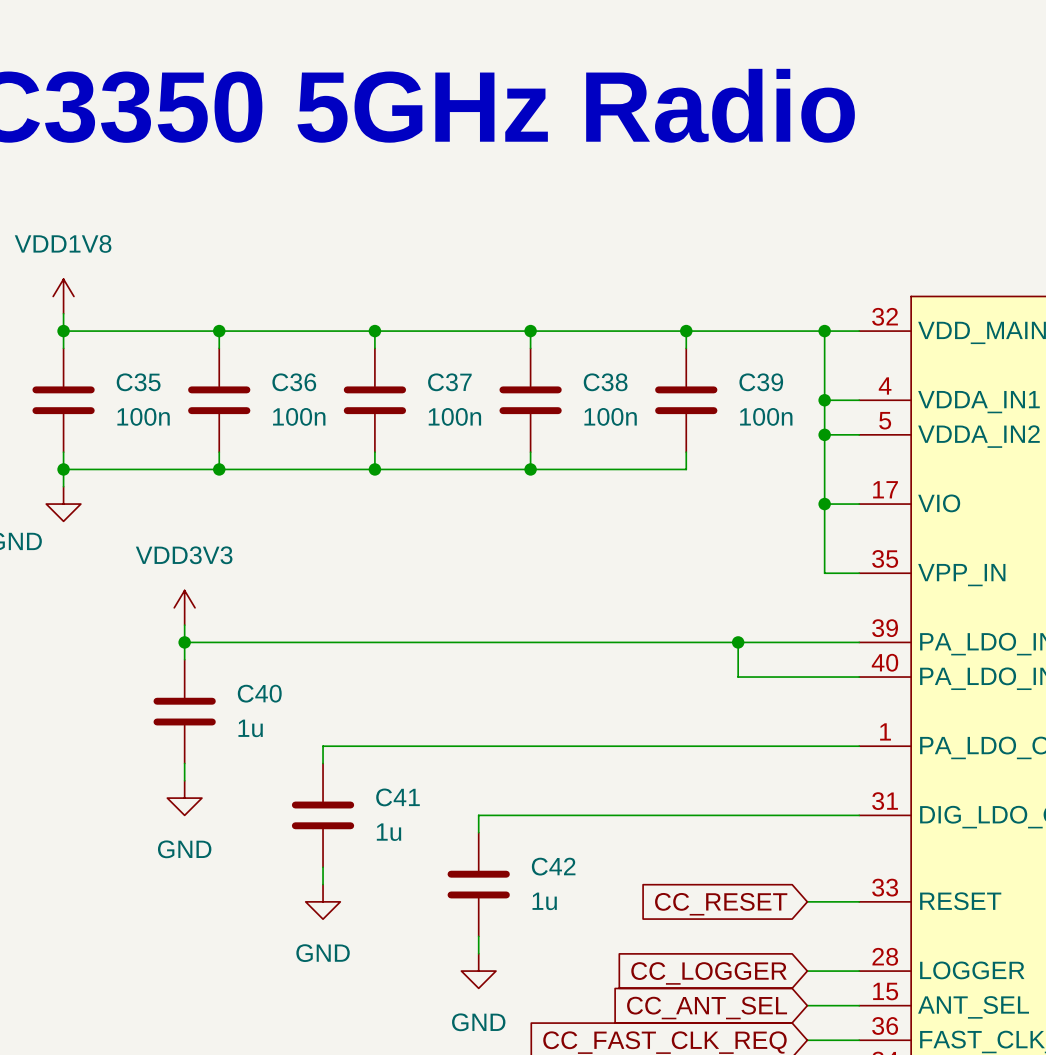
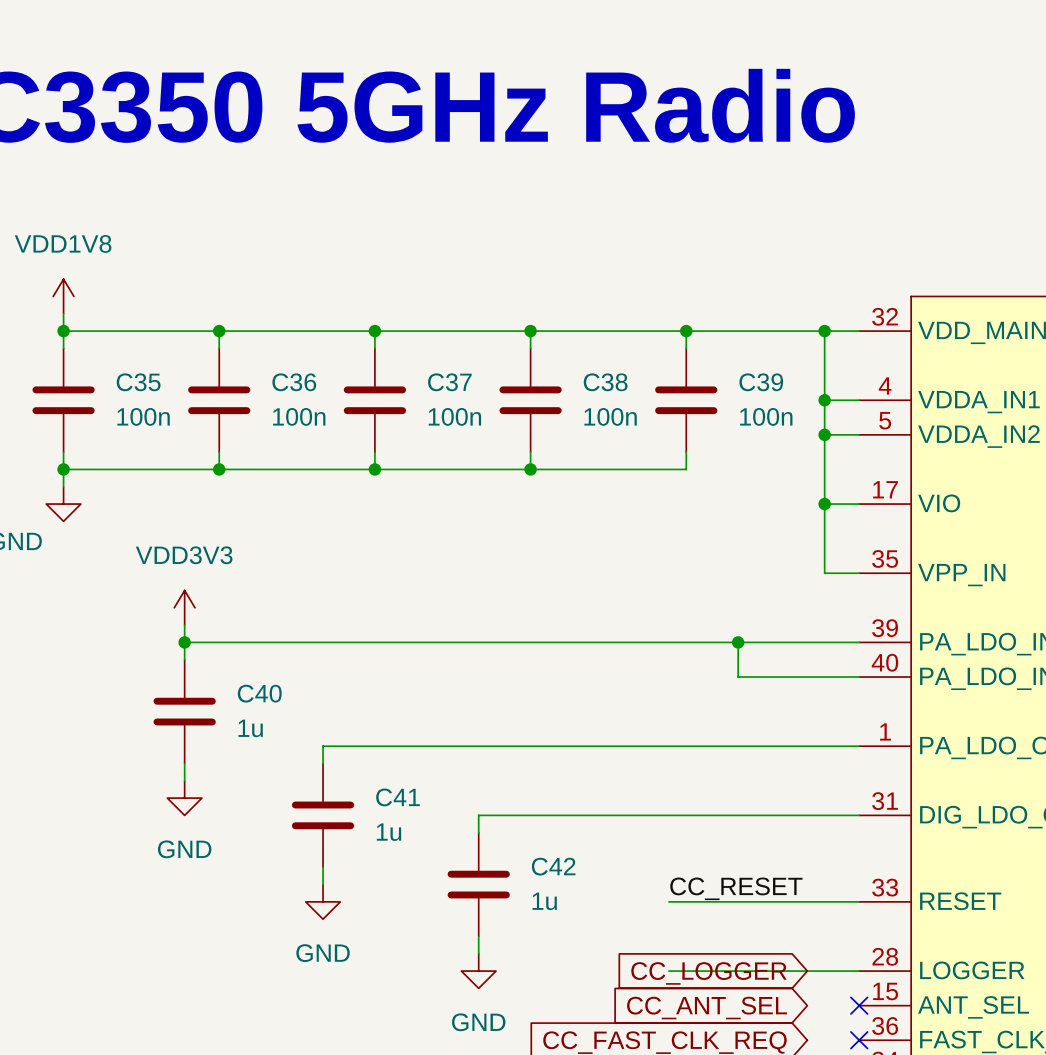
label: none -> CC_RESET (736, 888)
wire: none -> (668, 901) (807, 901)
global label: CC_RESET (721, 904) -> none
wire: none -> (668, 971) (807, 971)
wire: (807, 1005) (859, 1005) -> none
no-connect mark: none -> (859, 1005)
wire: (807, 1040) (859, 1040) -> none
no-connect mark: none -> (859, 1040)

